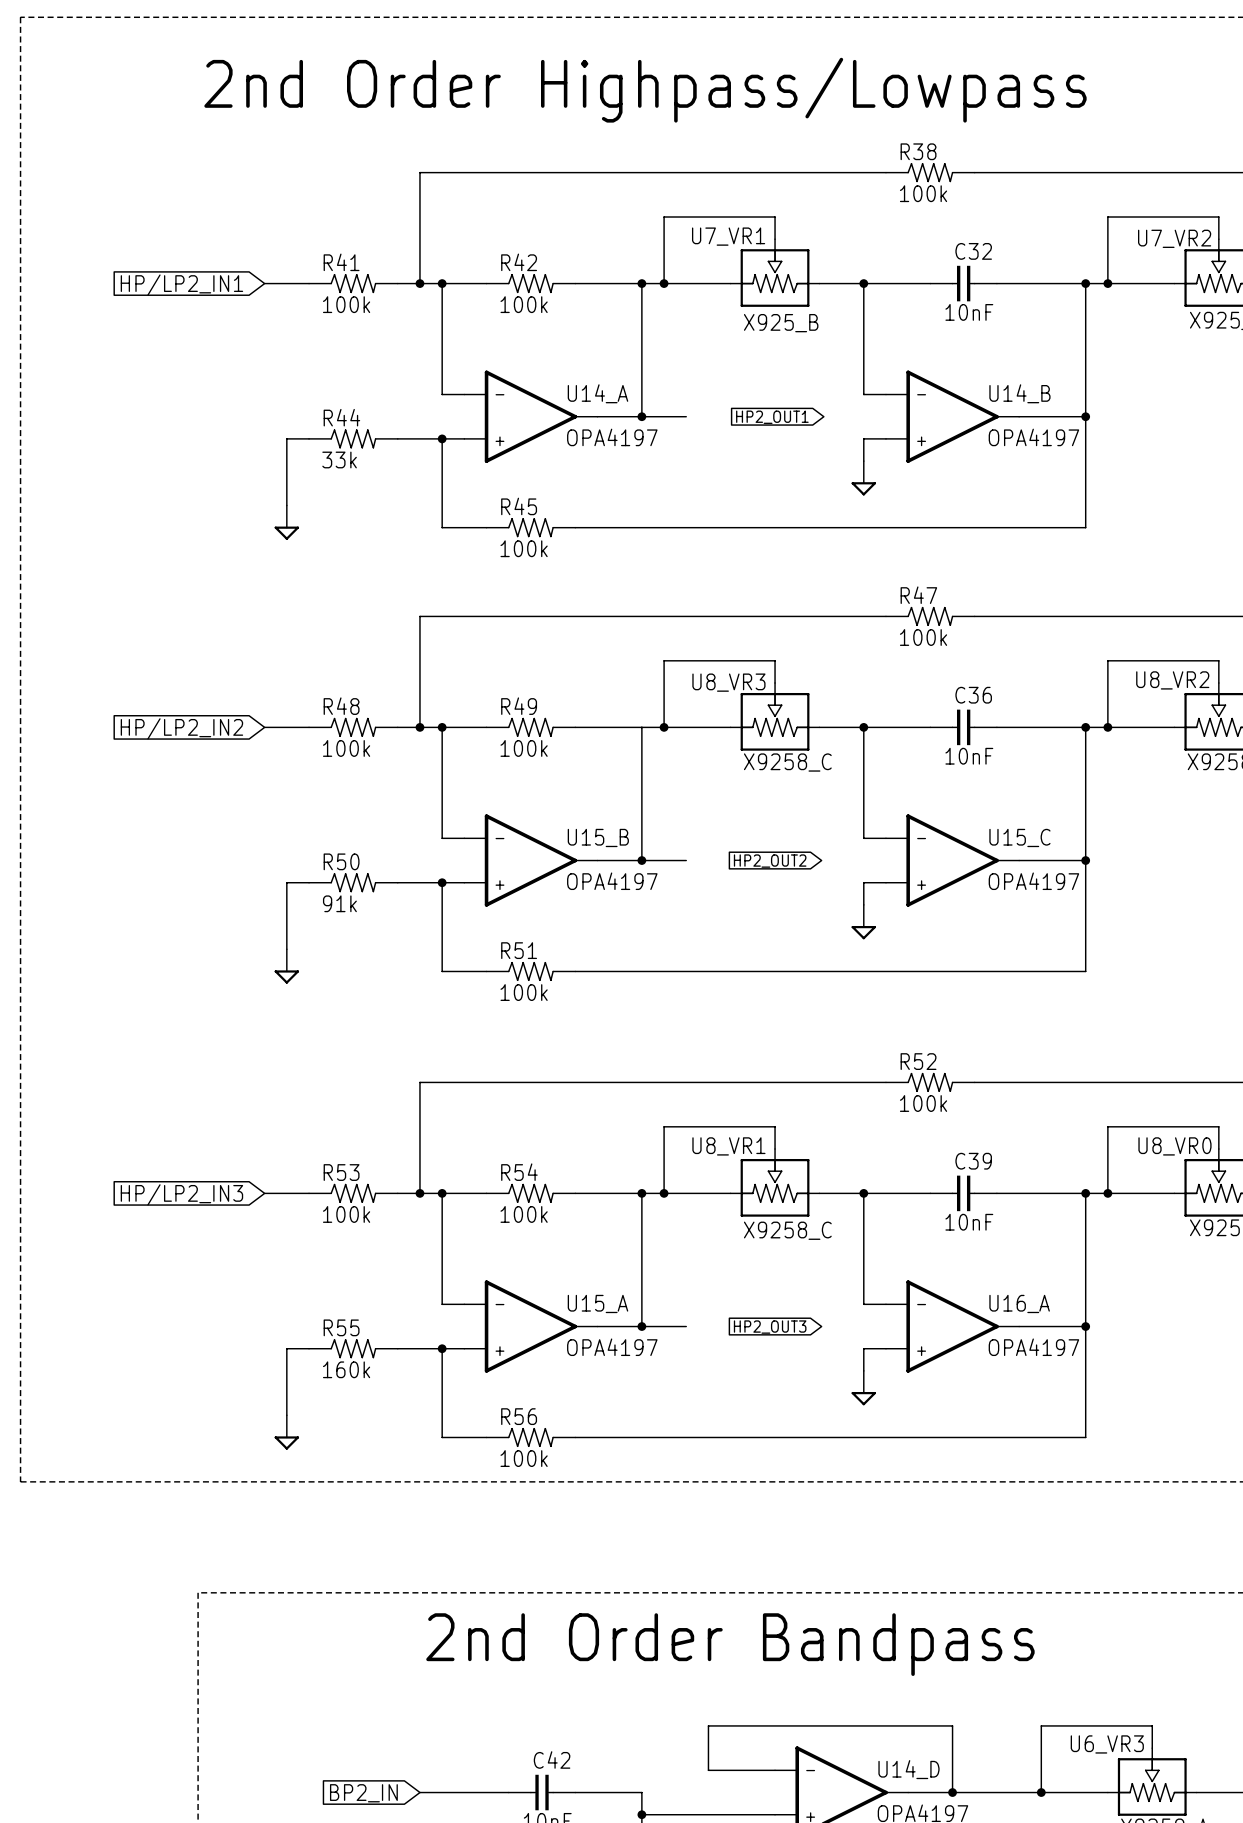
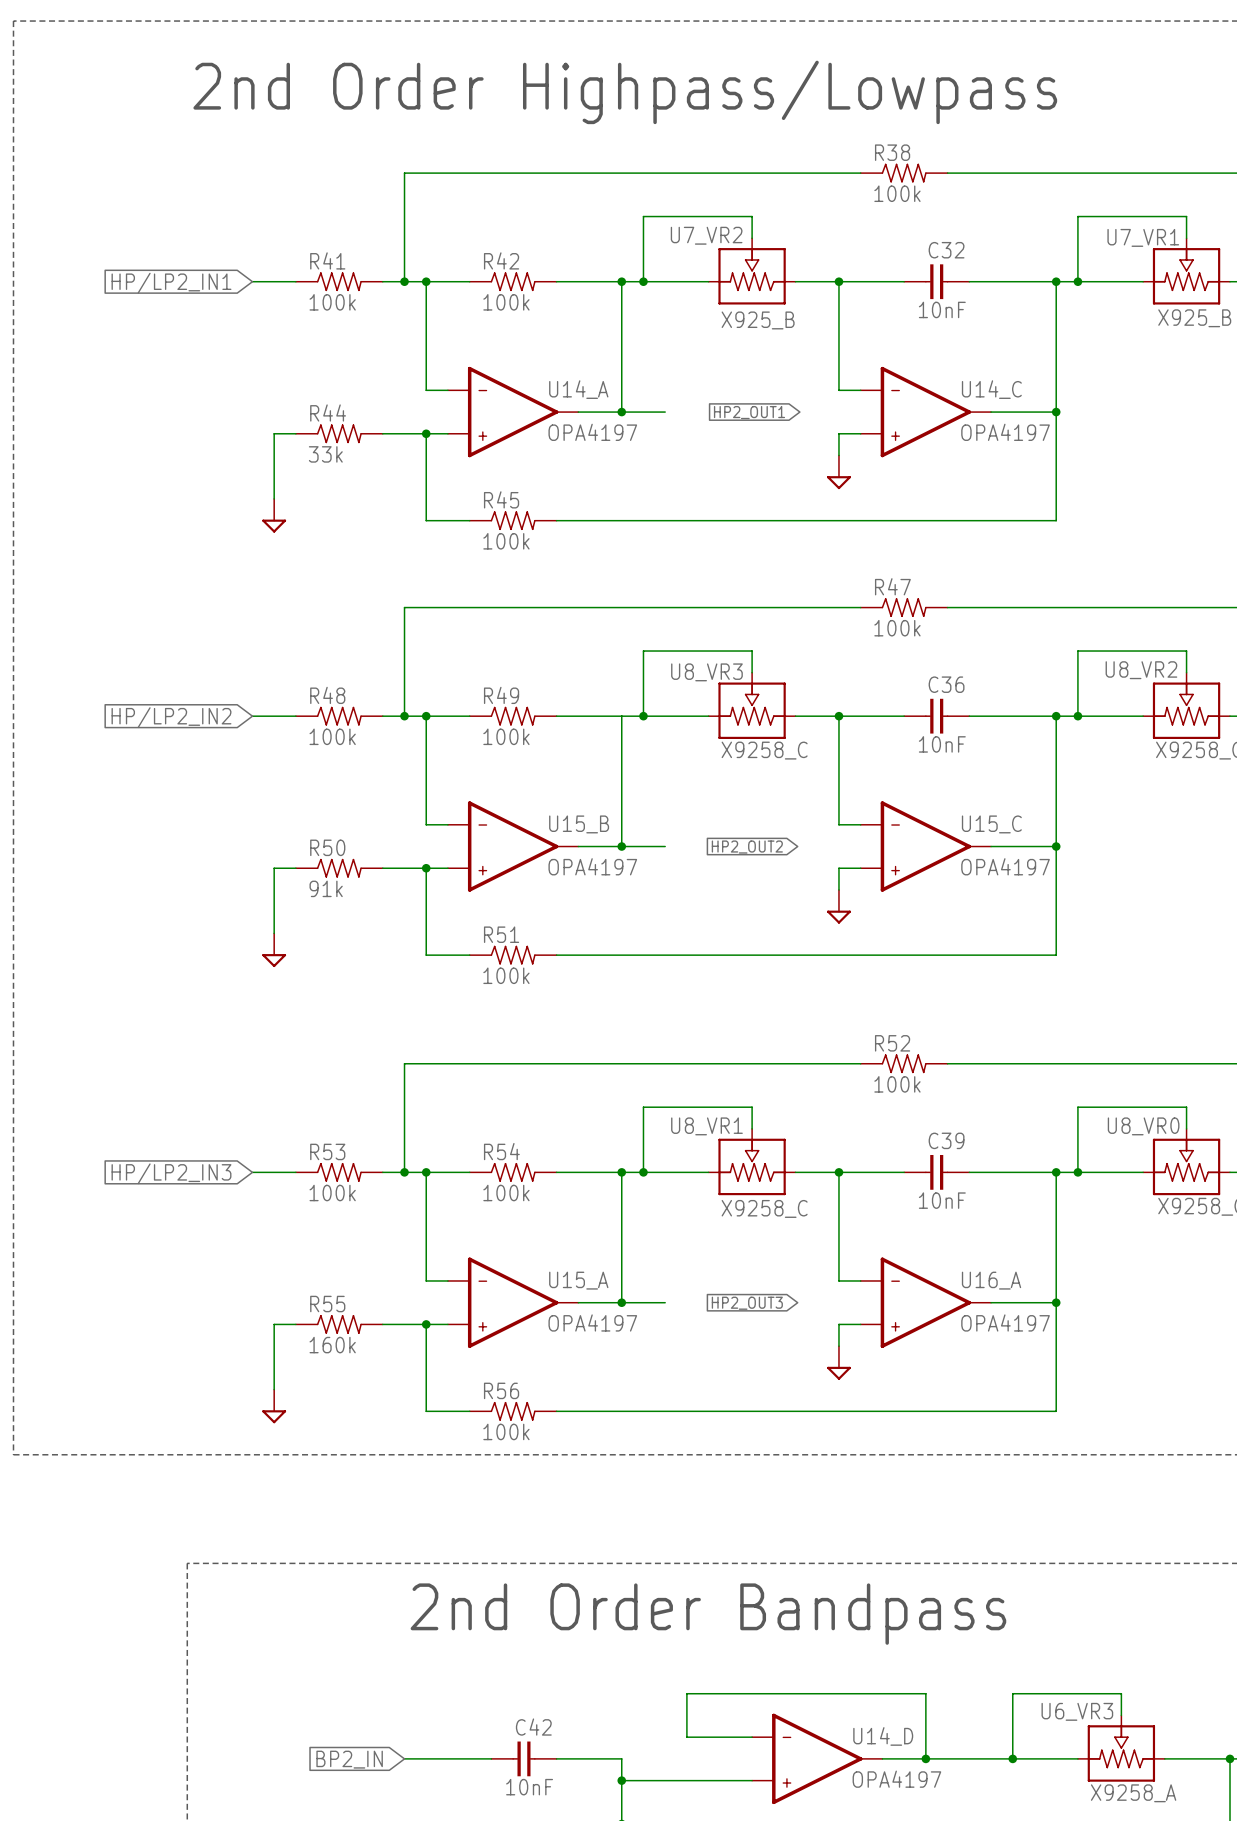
U7_VR1 name: U7_VR1 (728, 236) -> U7_VR2 (706, 235)
U7_VR2 name: U7_VR2 (1174, 238) -> U7_VR1 (1143, 237)
U14_B name: U14_B (1019, 393) -> U14_C (991, 389)

